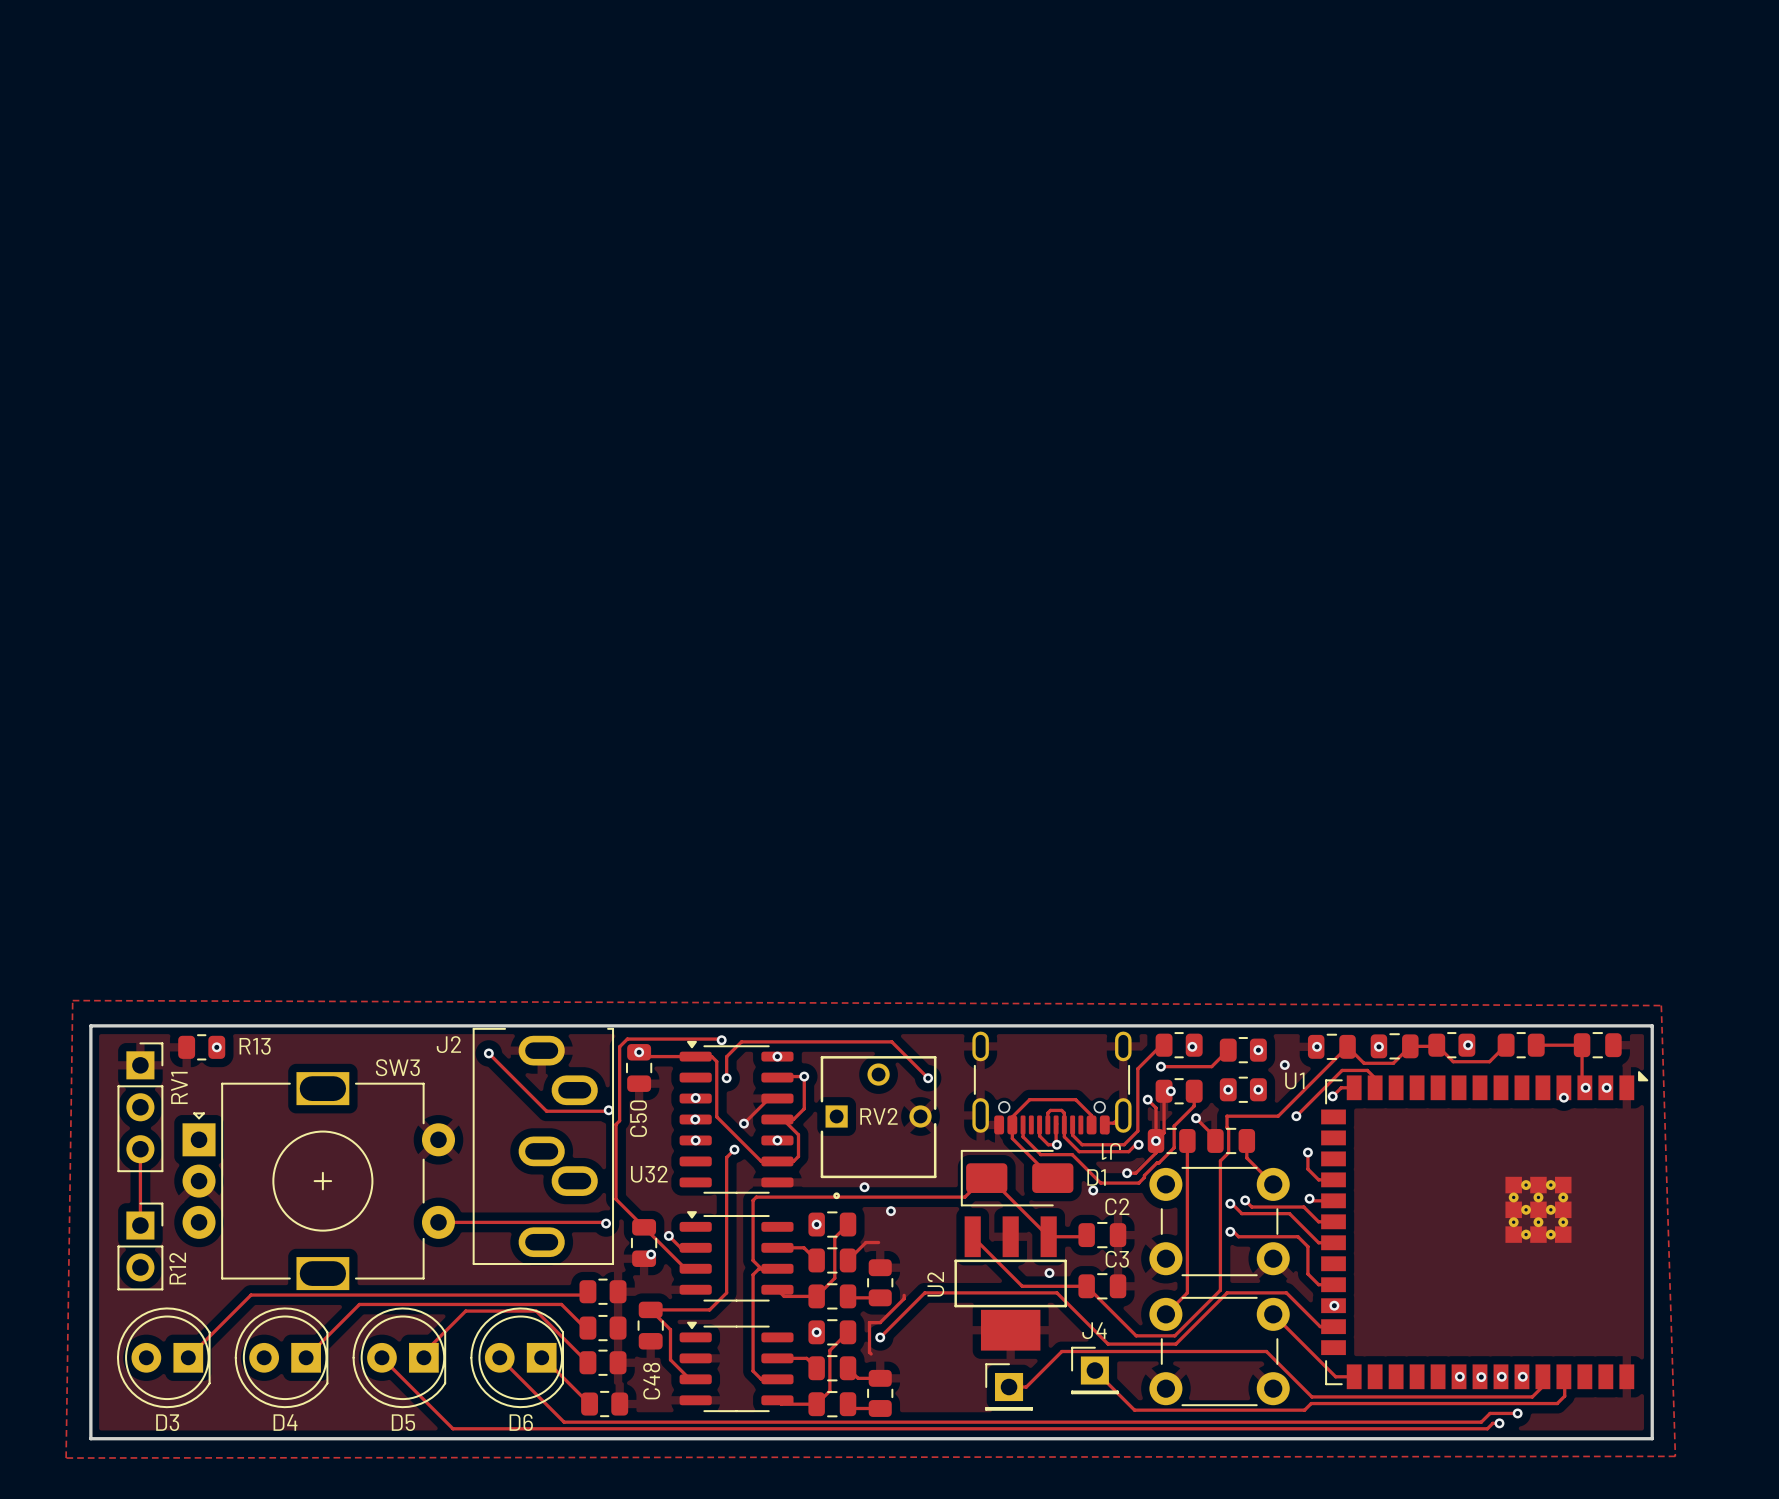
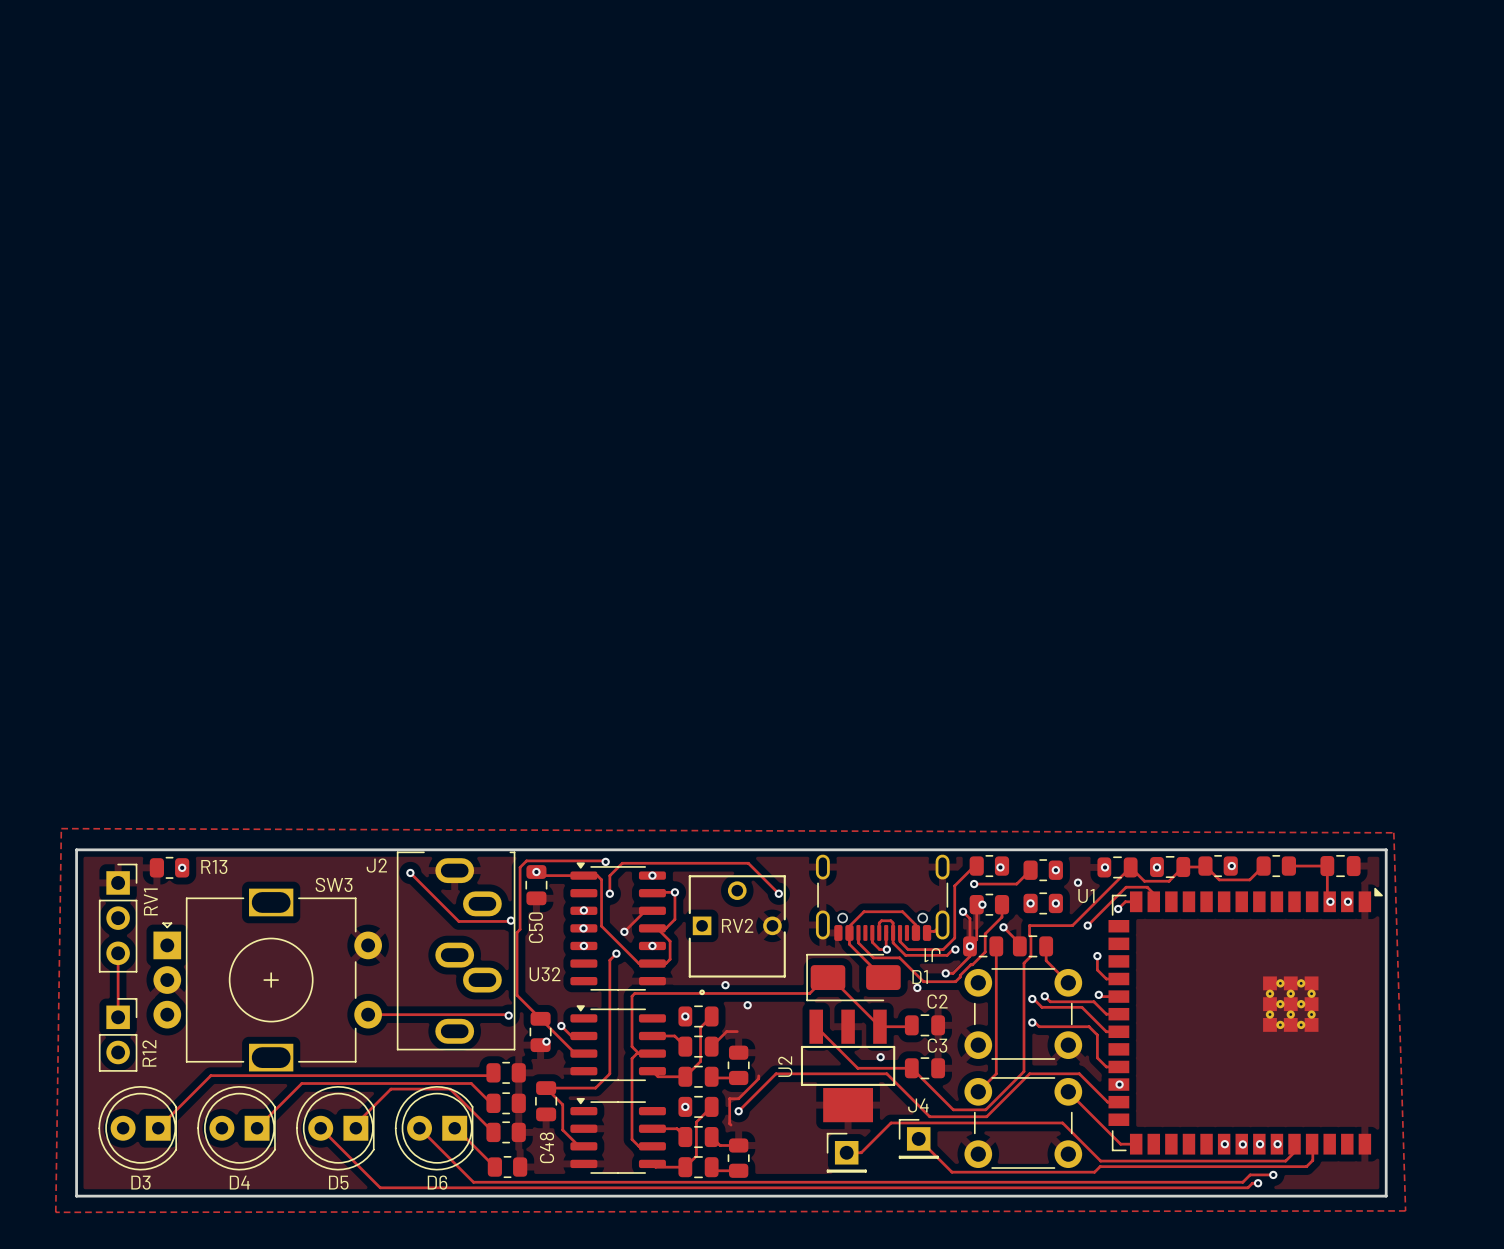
via: (1563, 1097) -> none

